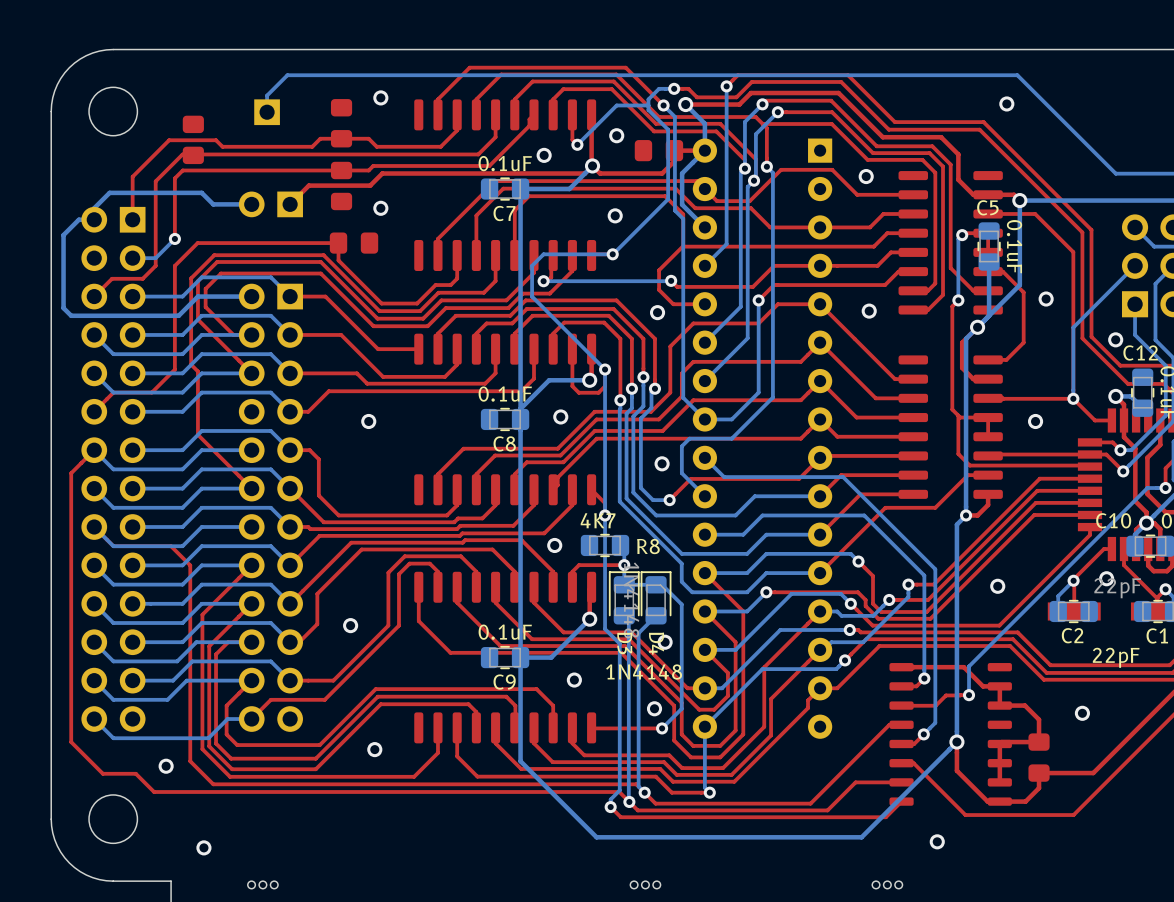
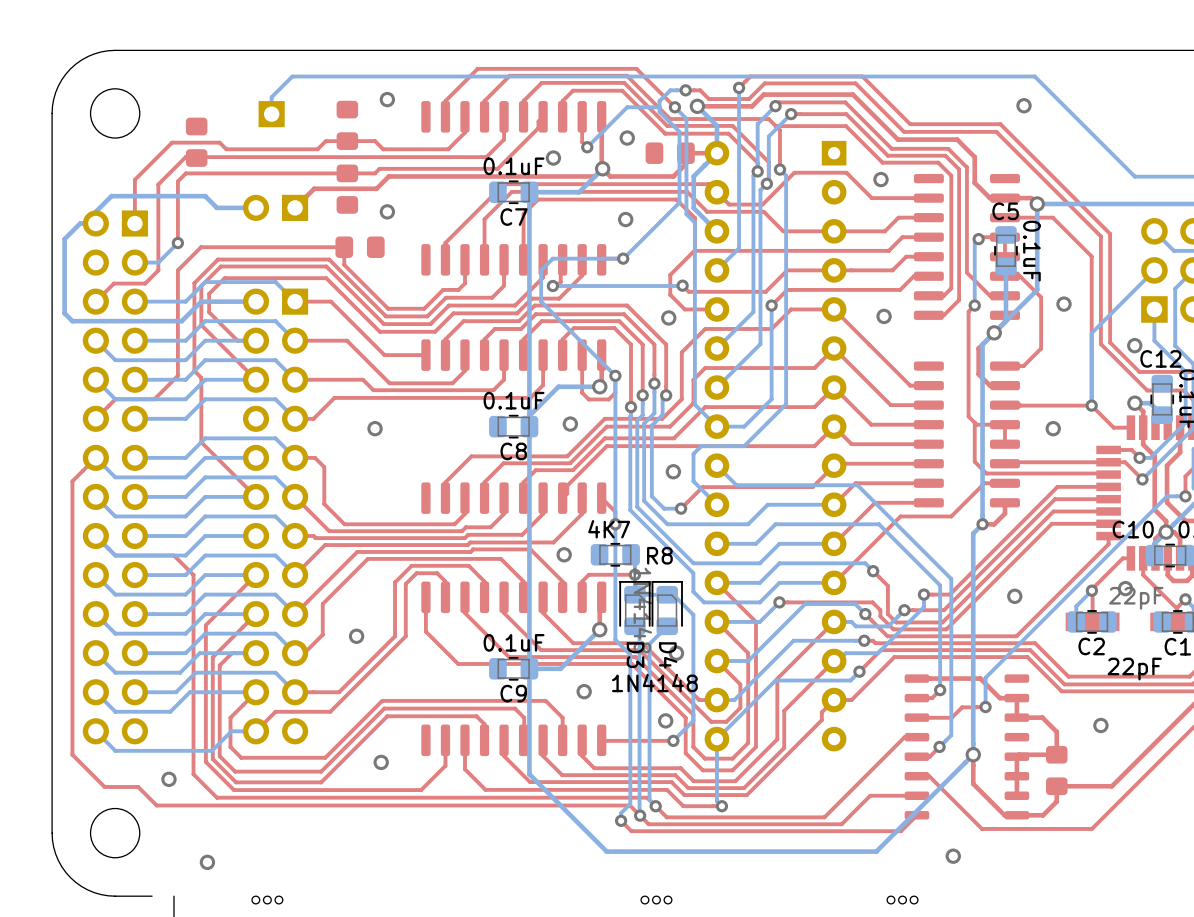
board edge: (171, 881) (149, 881) -> none

